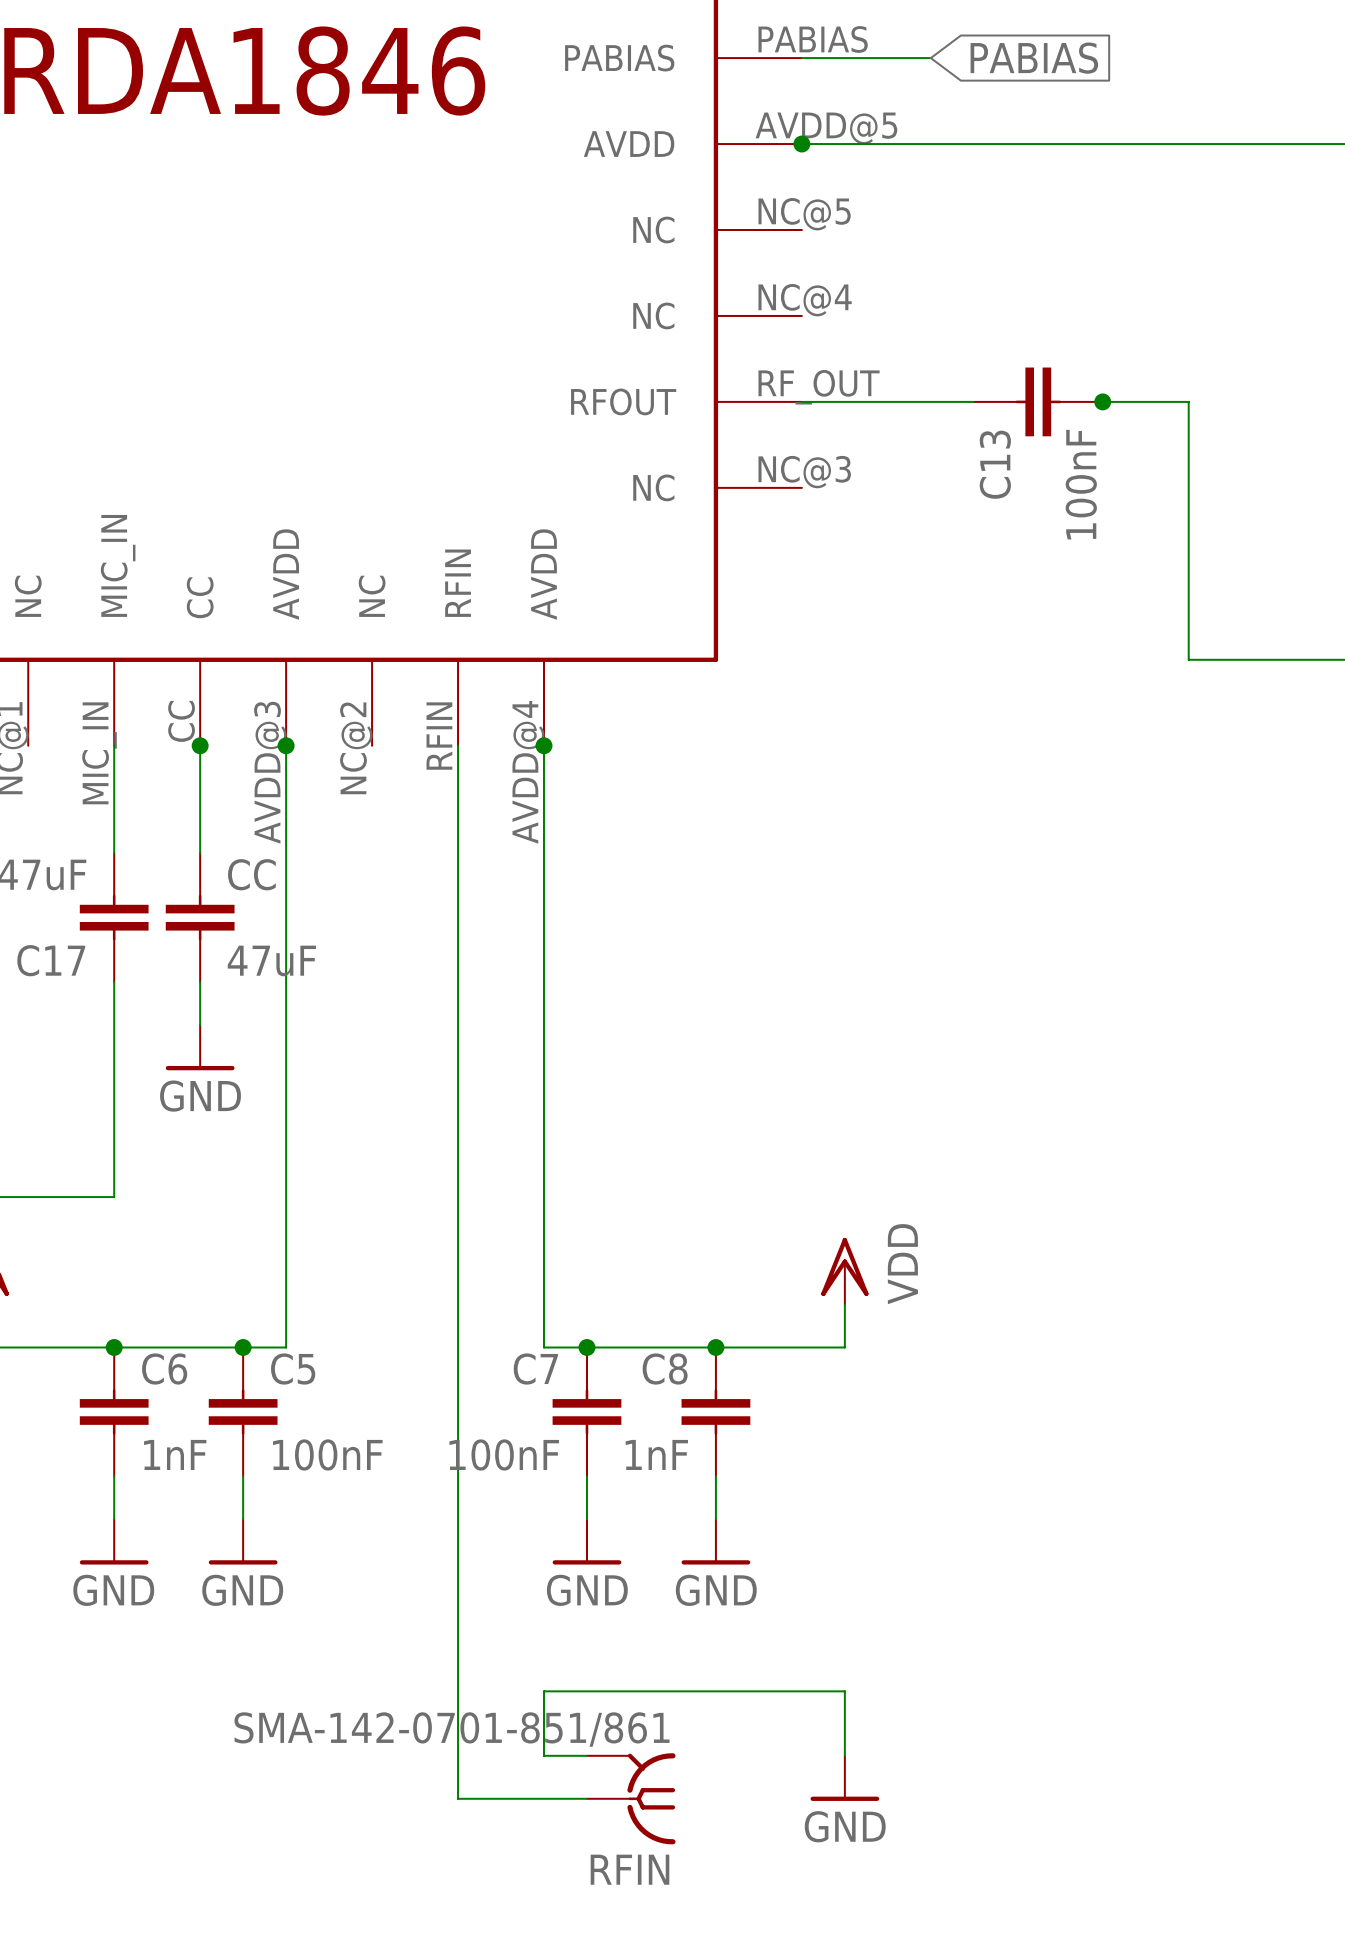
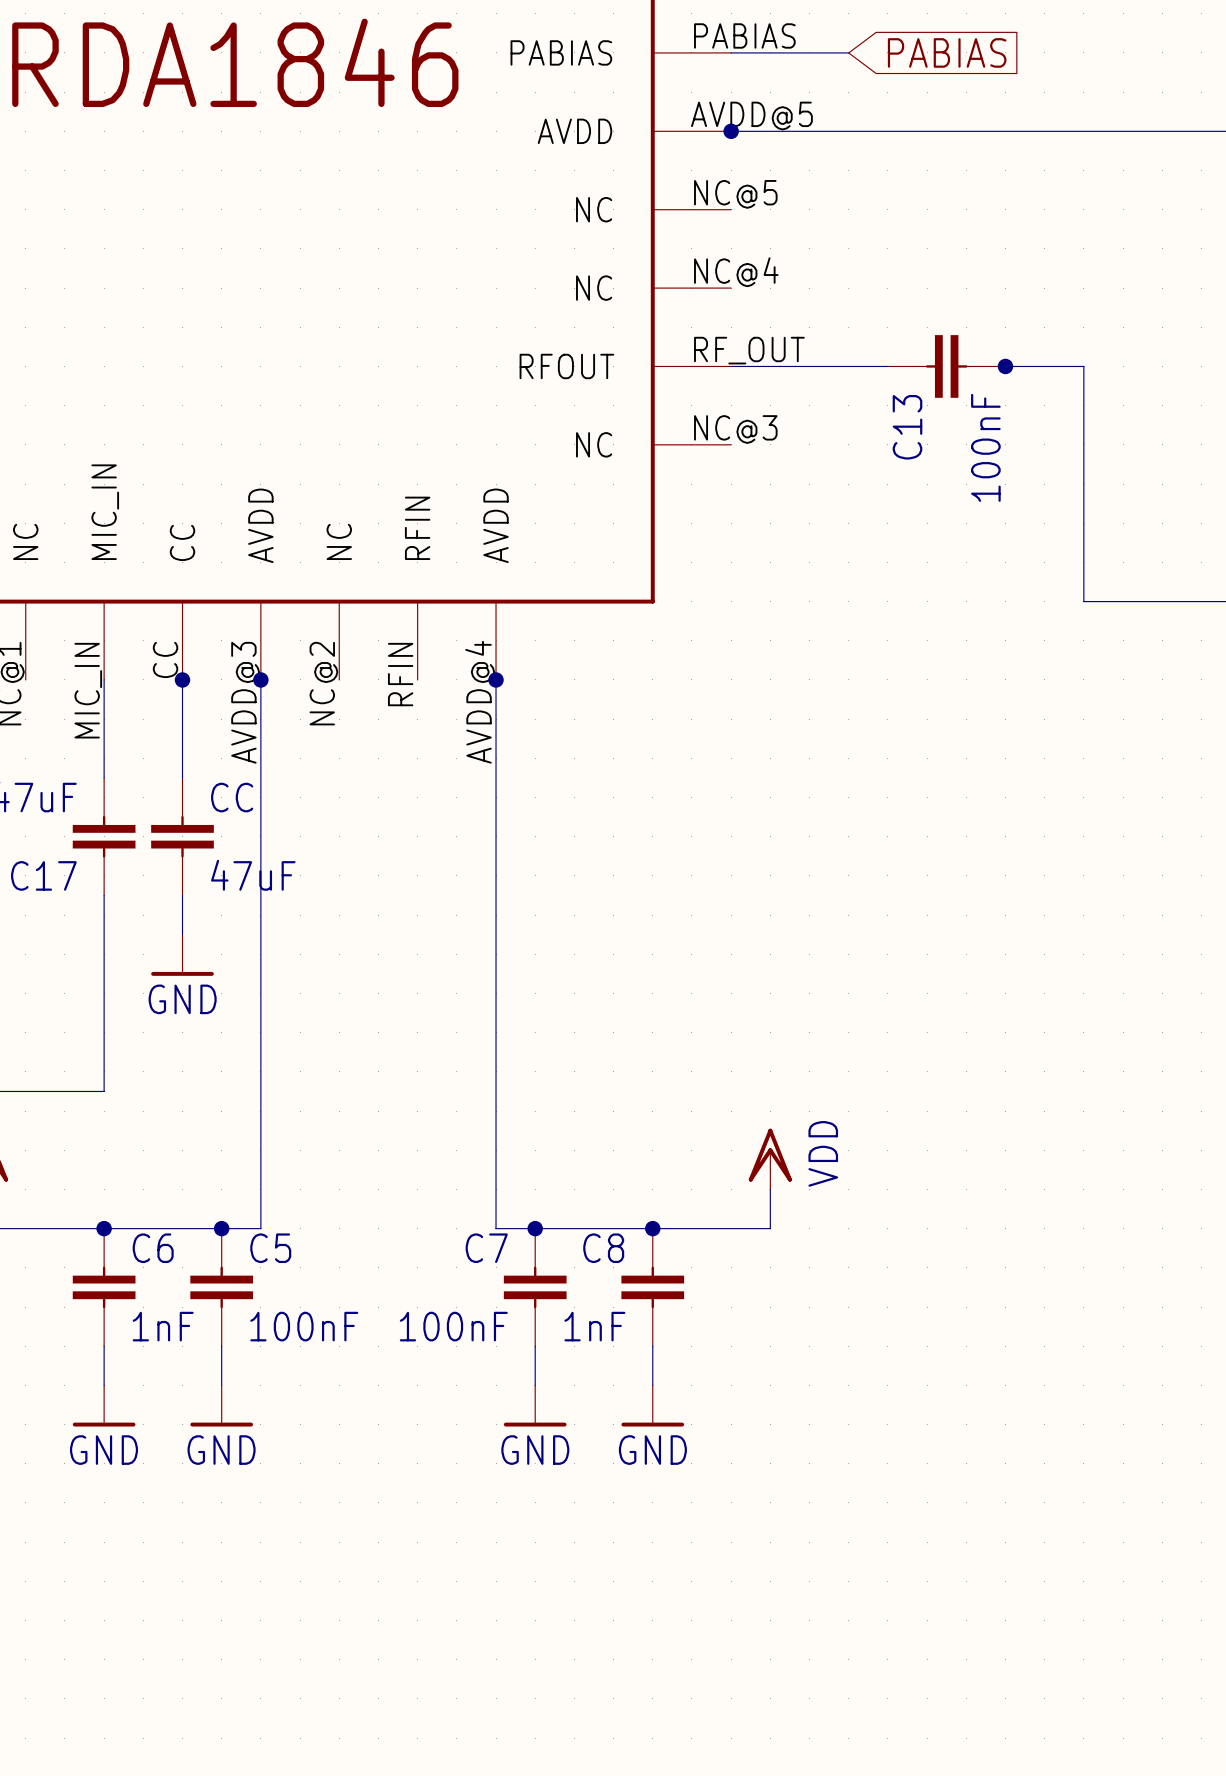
wire: (458, 745) (458, 1798) (586, 1798) -> none
wire: (586, 1755) (544, 1755) (544, 1691) (844, 1691) (844, 1755) -> none
power symbol: GND (844, 1778) -> none
RFIN: SMA-142-0701-851/861 (631, 1798) -> none

